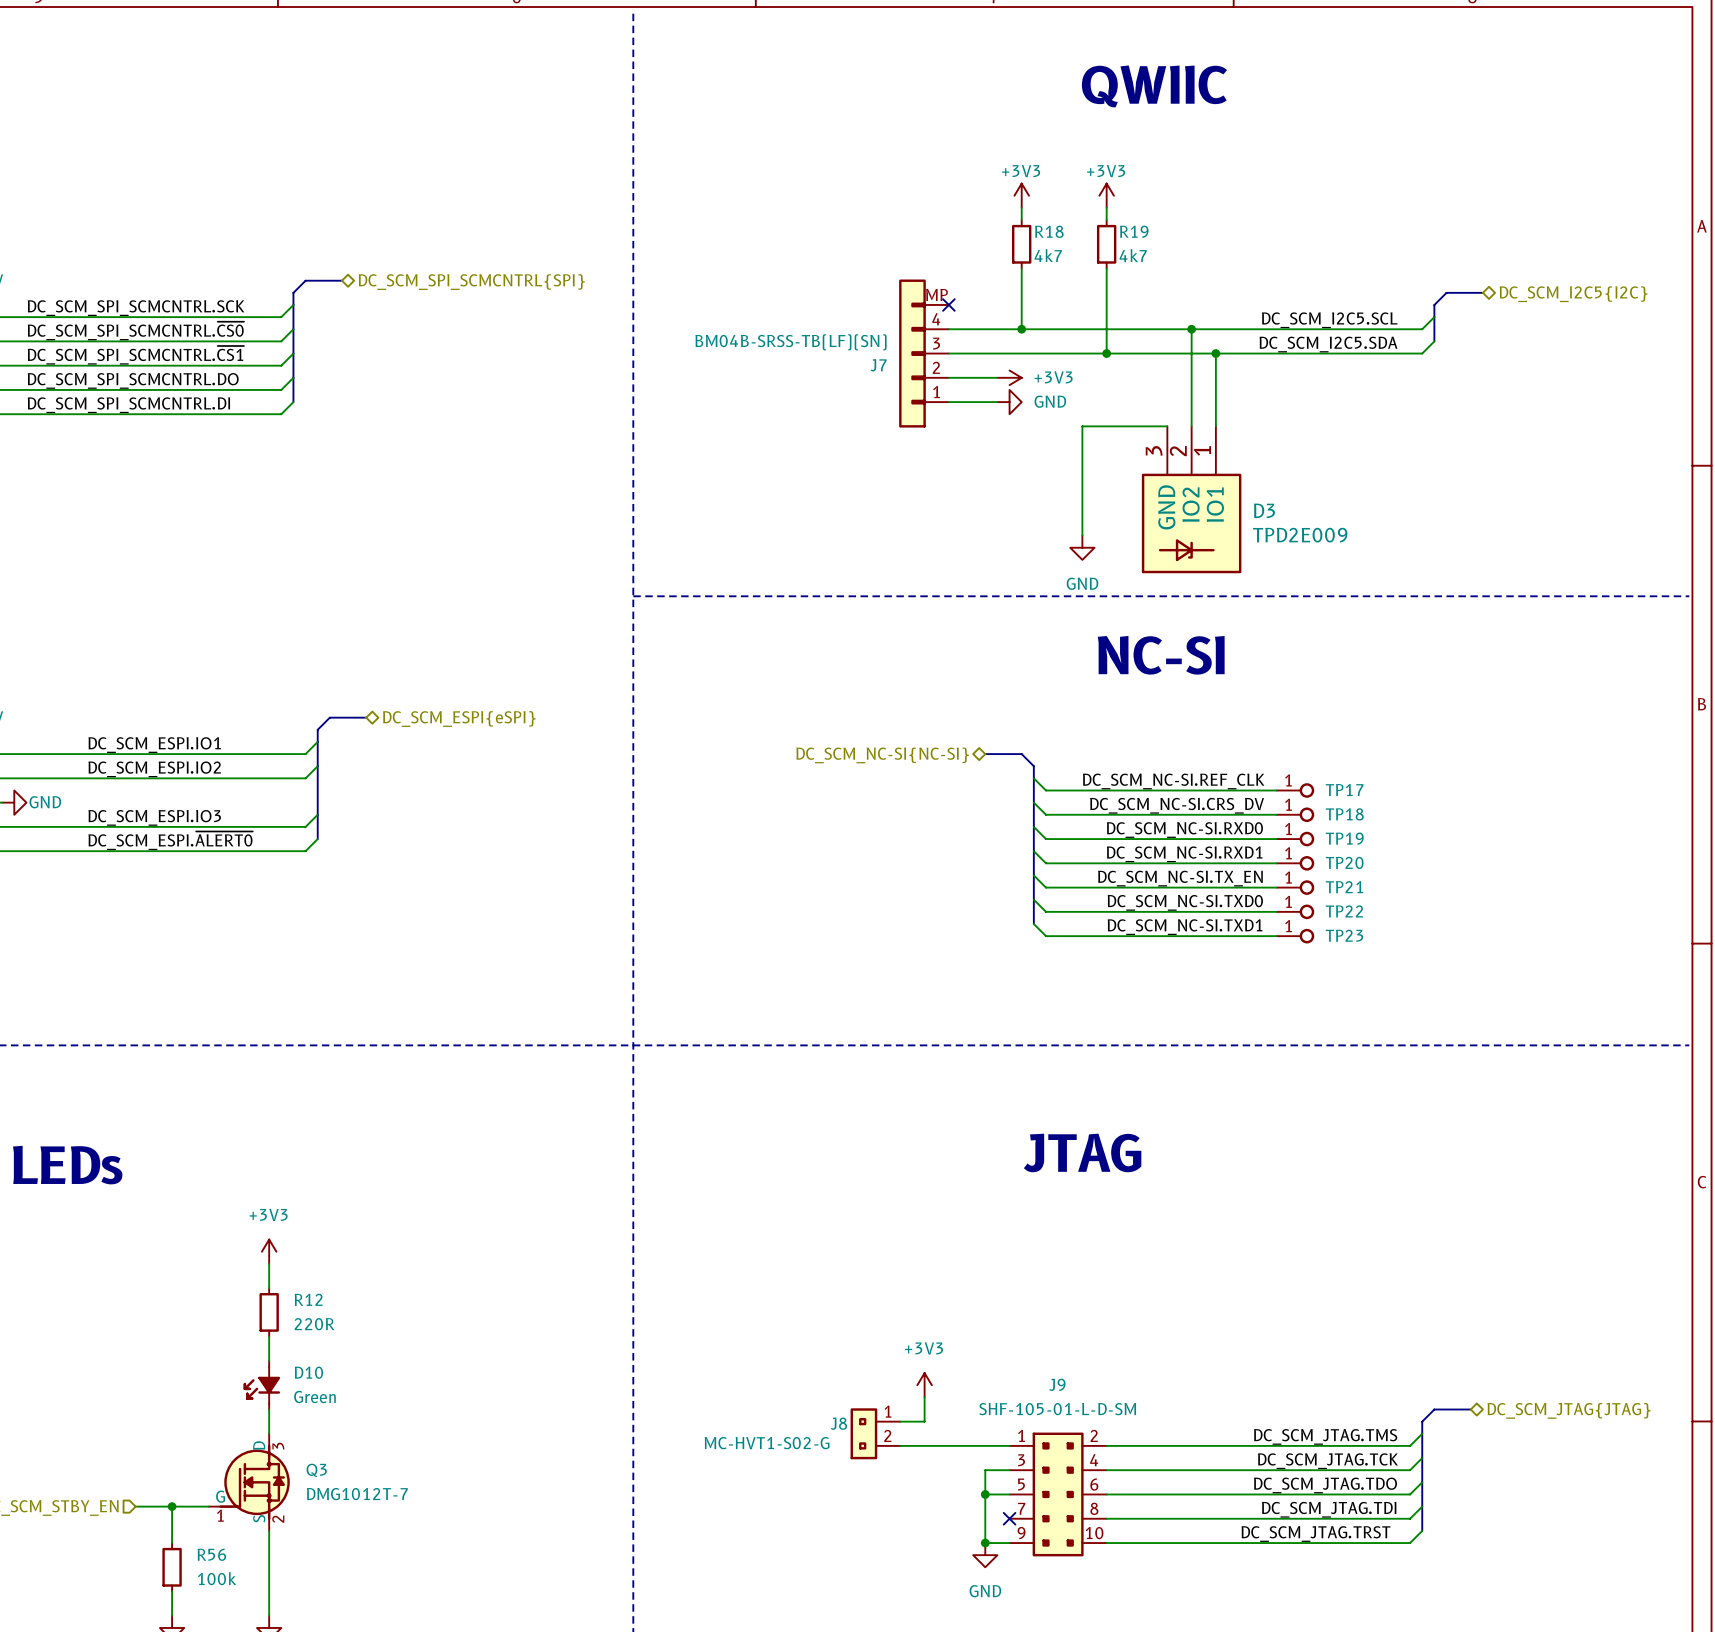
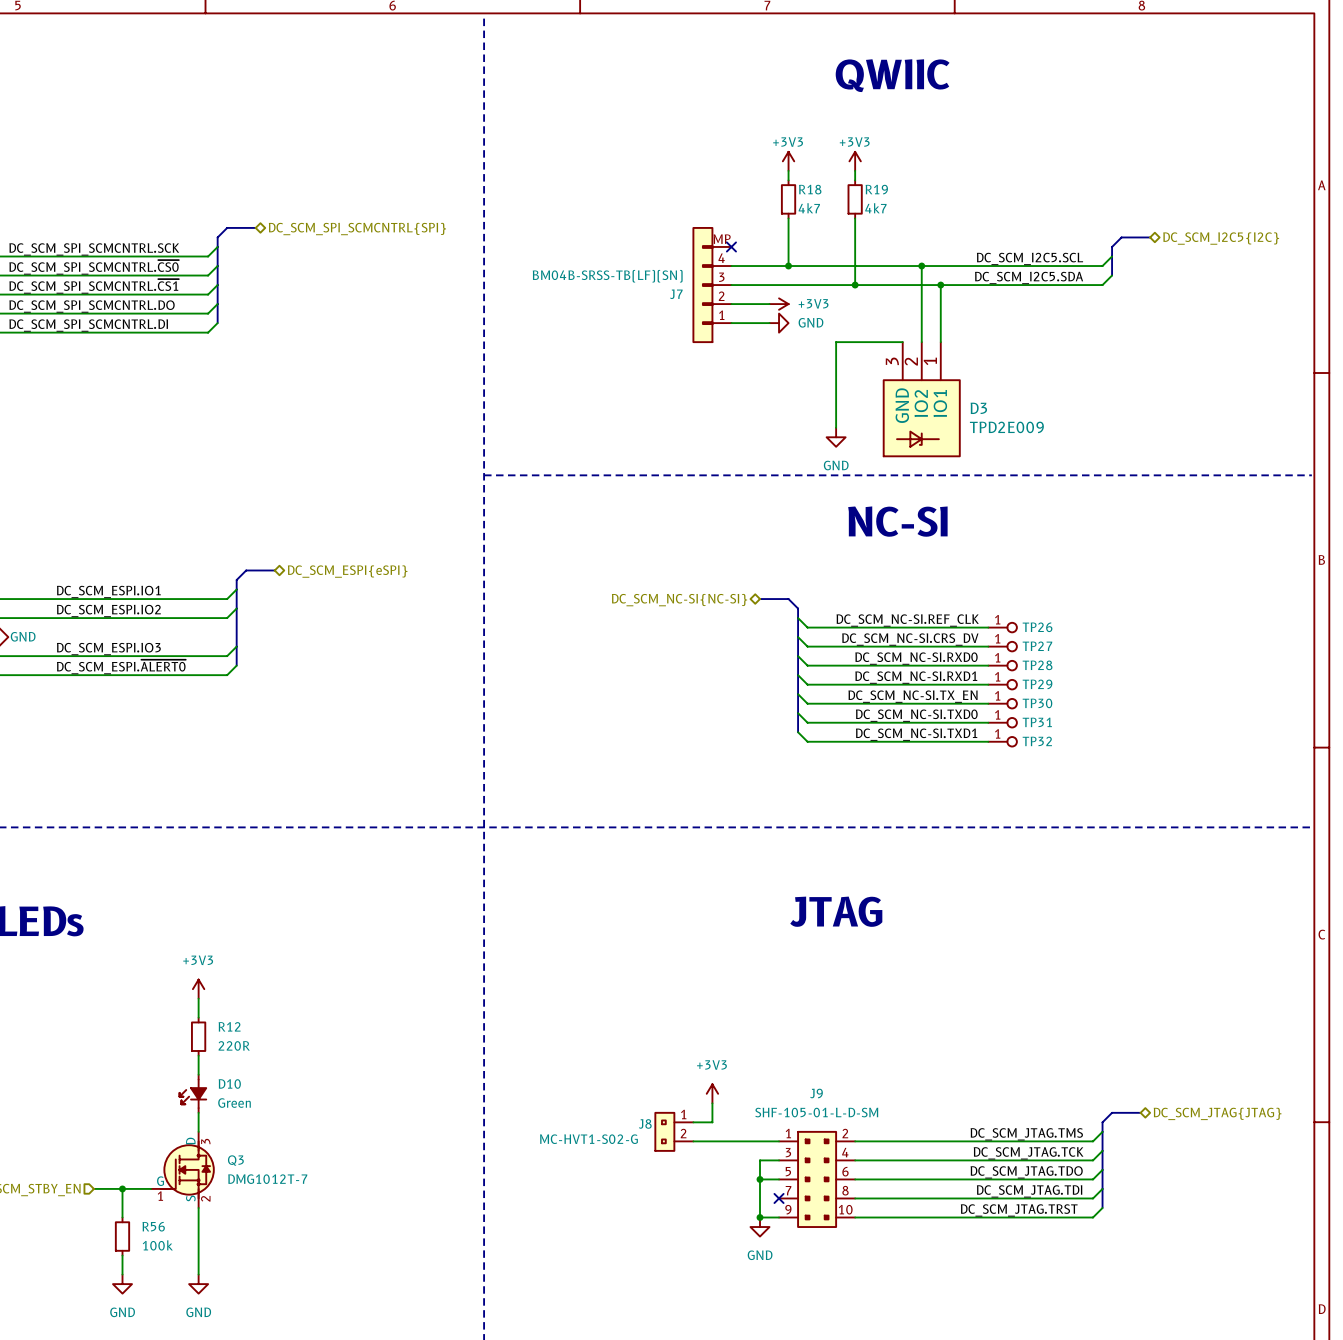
TP17 name: TP17 (1344, 790) -> TP26 (1037, 627)
TP18 name: TP18 (1344, 814) -> TP27 (1037, 646)
TP19 name: TP19 (1344, 838) -> TP28 (1037, 665)
TP20 name: TP20 (1344, 862) -> TP29 (1037, 684)
TP21 name: TP21 (1344, 887) -> TP30 (1037, 703)
TP22 name: TP22 (1344, 911) -> TP31 (1037, 722)
TP23 name: TP23 (1344, 935) -> TP32 (1037, 741)

